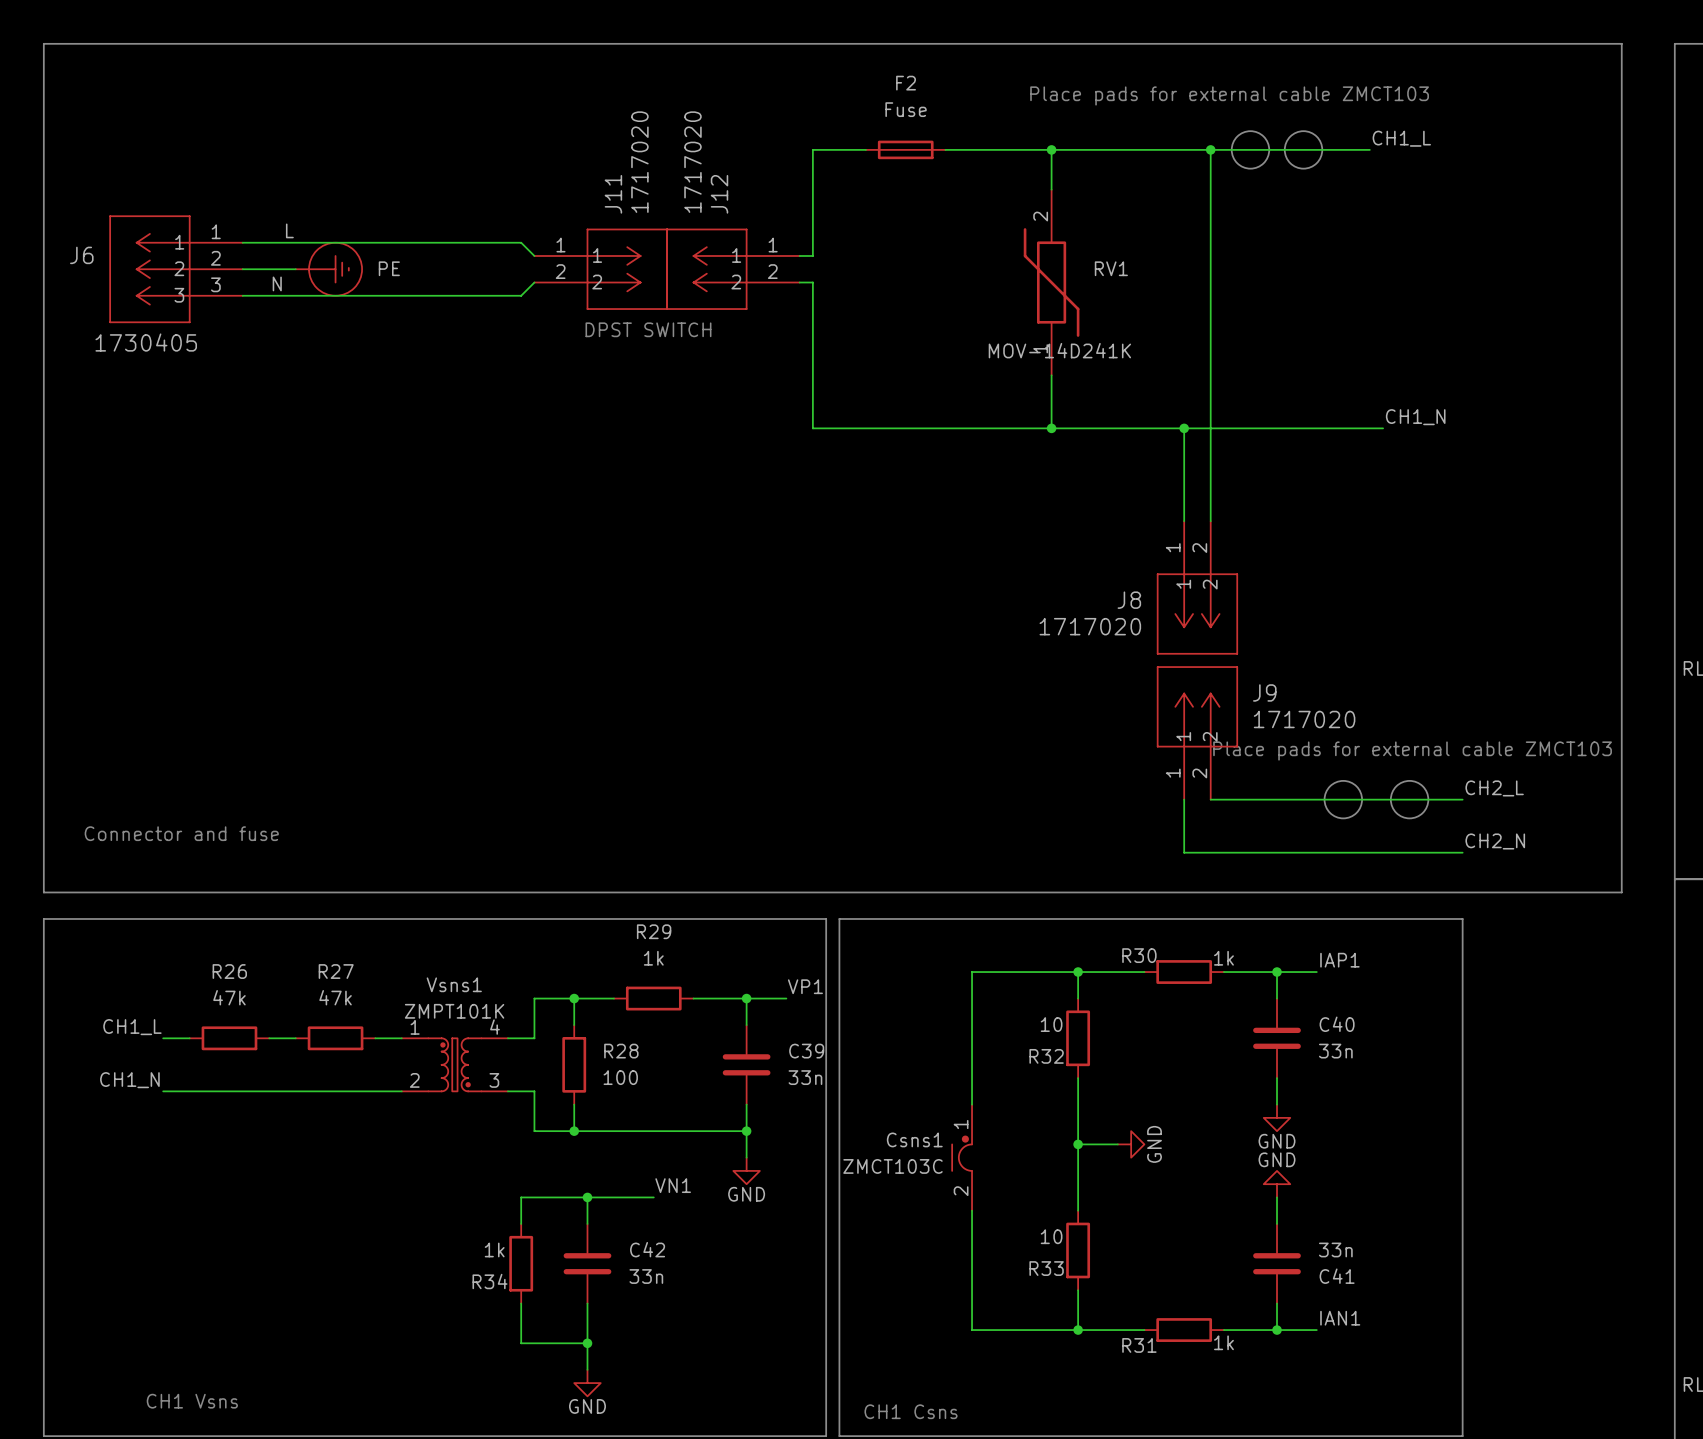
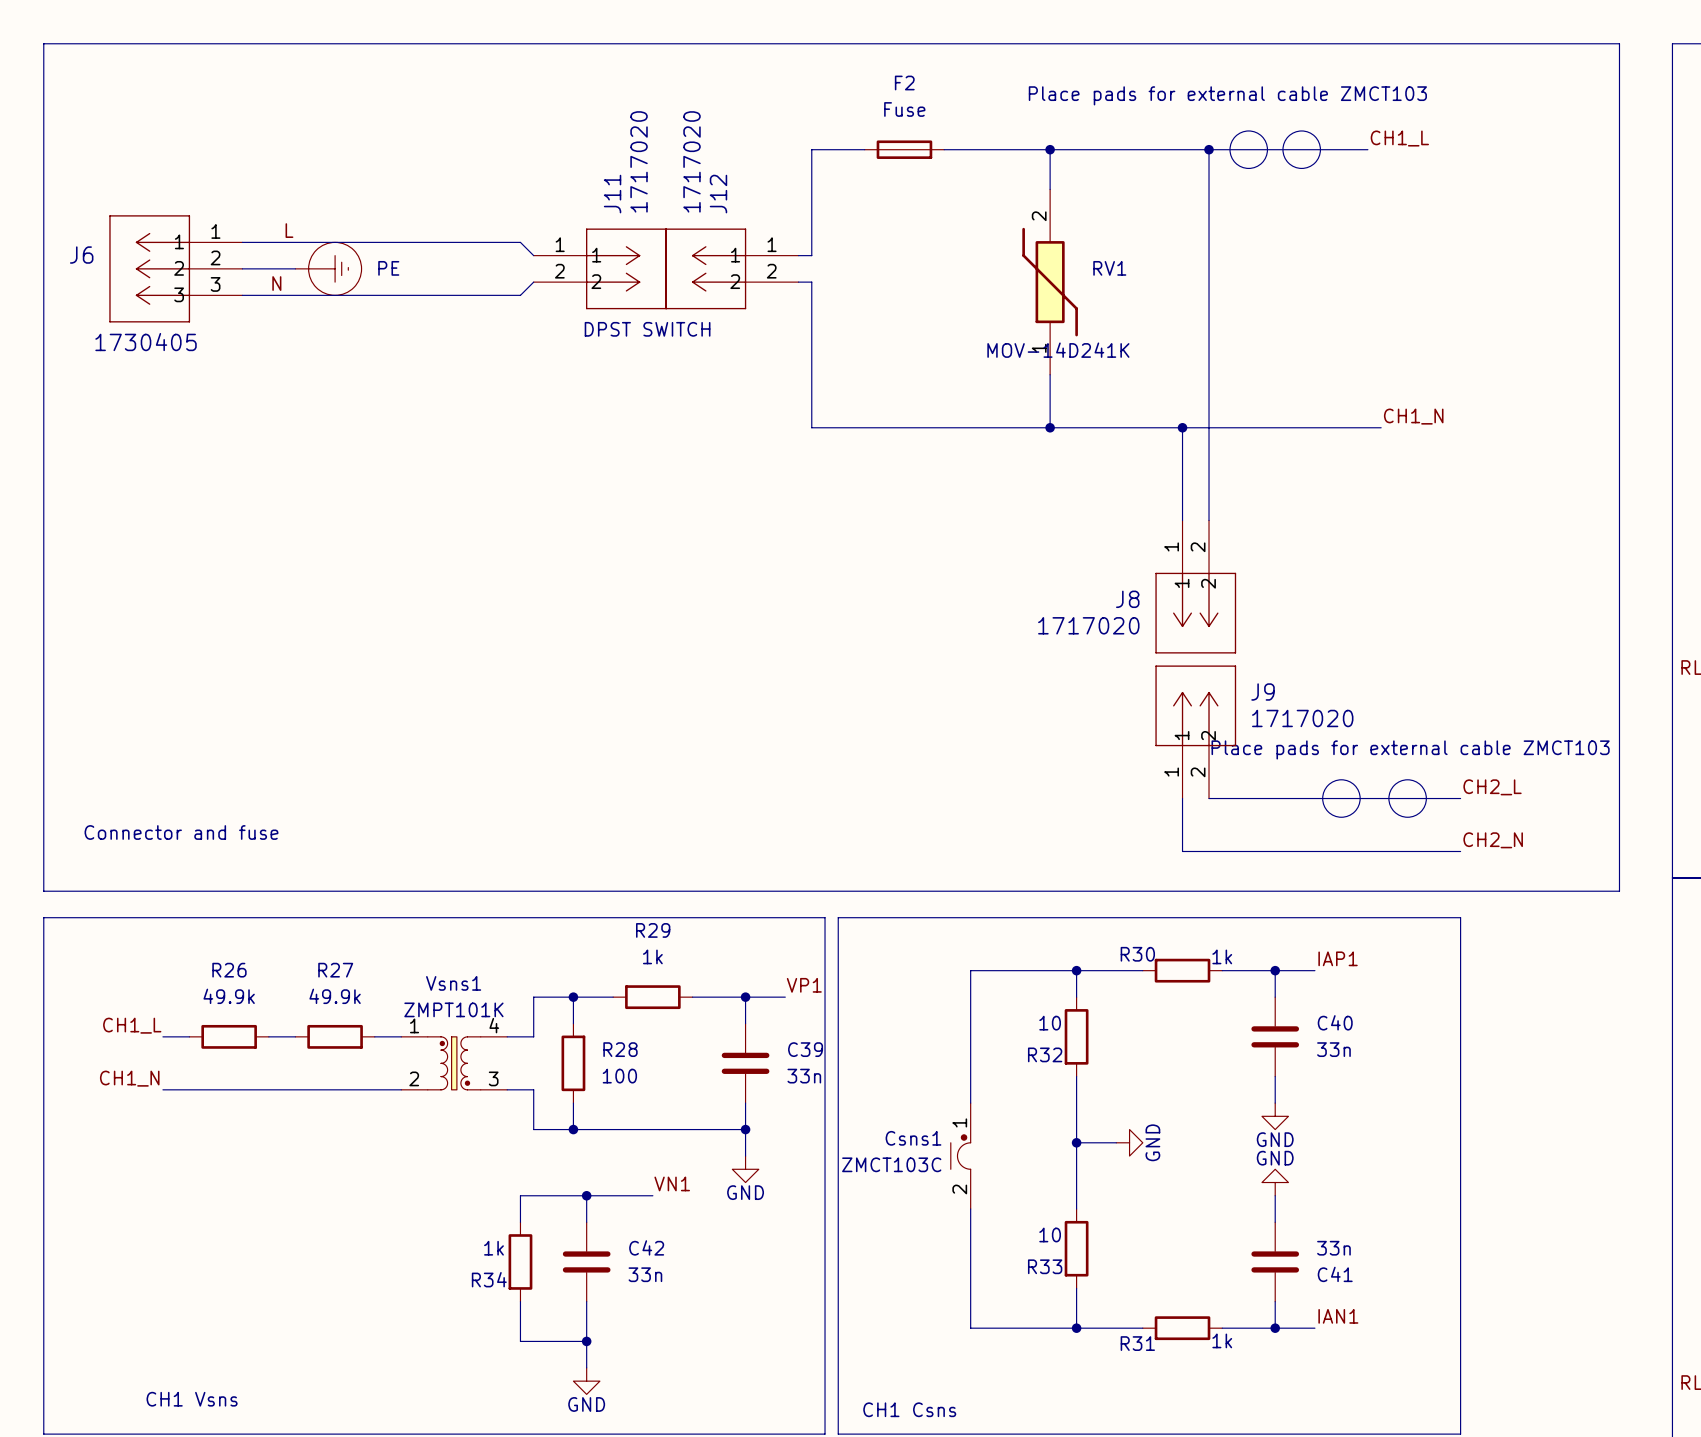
R26 value: 47k (229, 997) -> 49.9k (229, 996)
R27 value: 47k (335, 997) -> 49.9k (335, 996)

